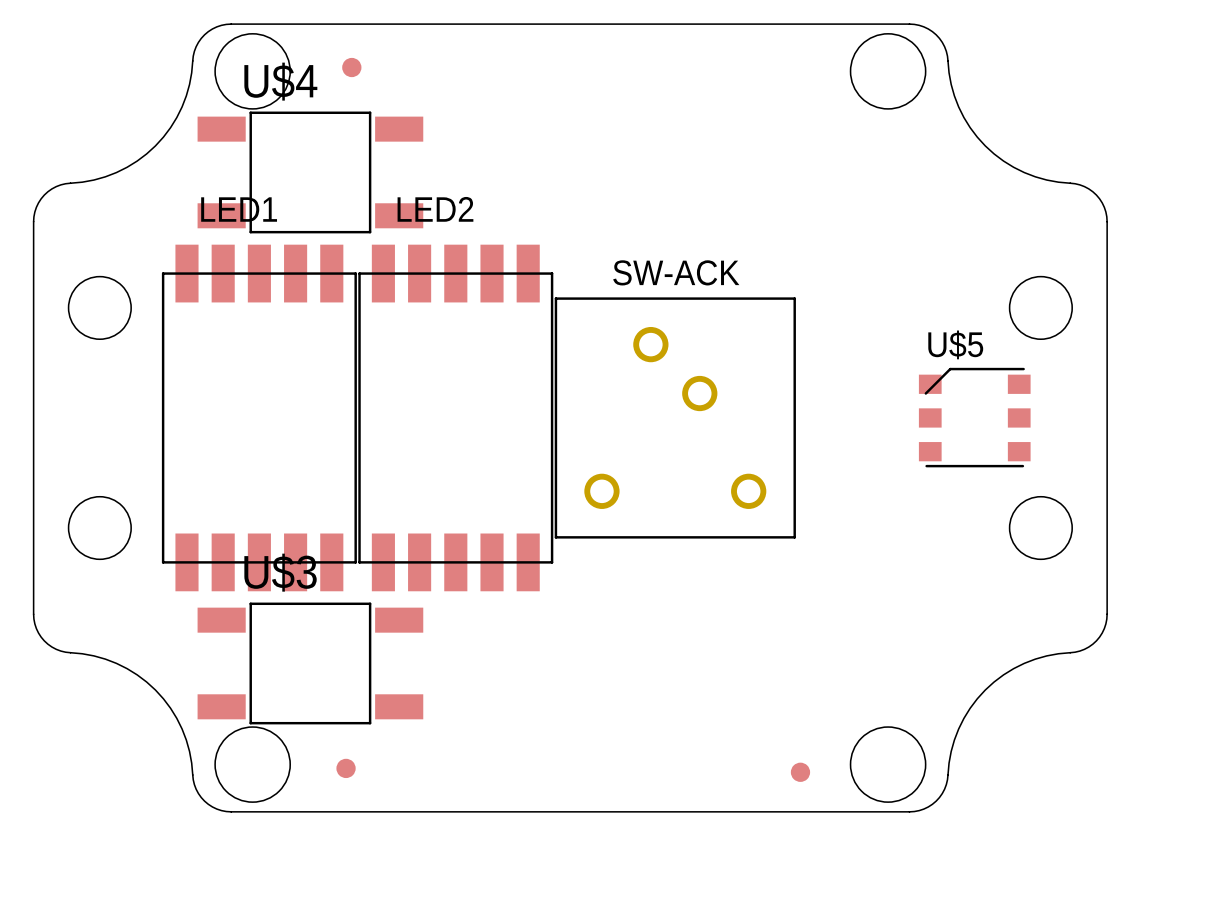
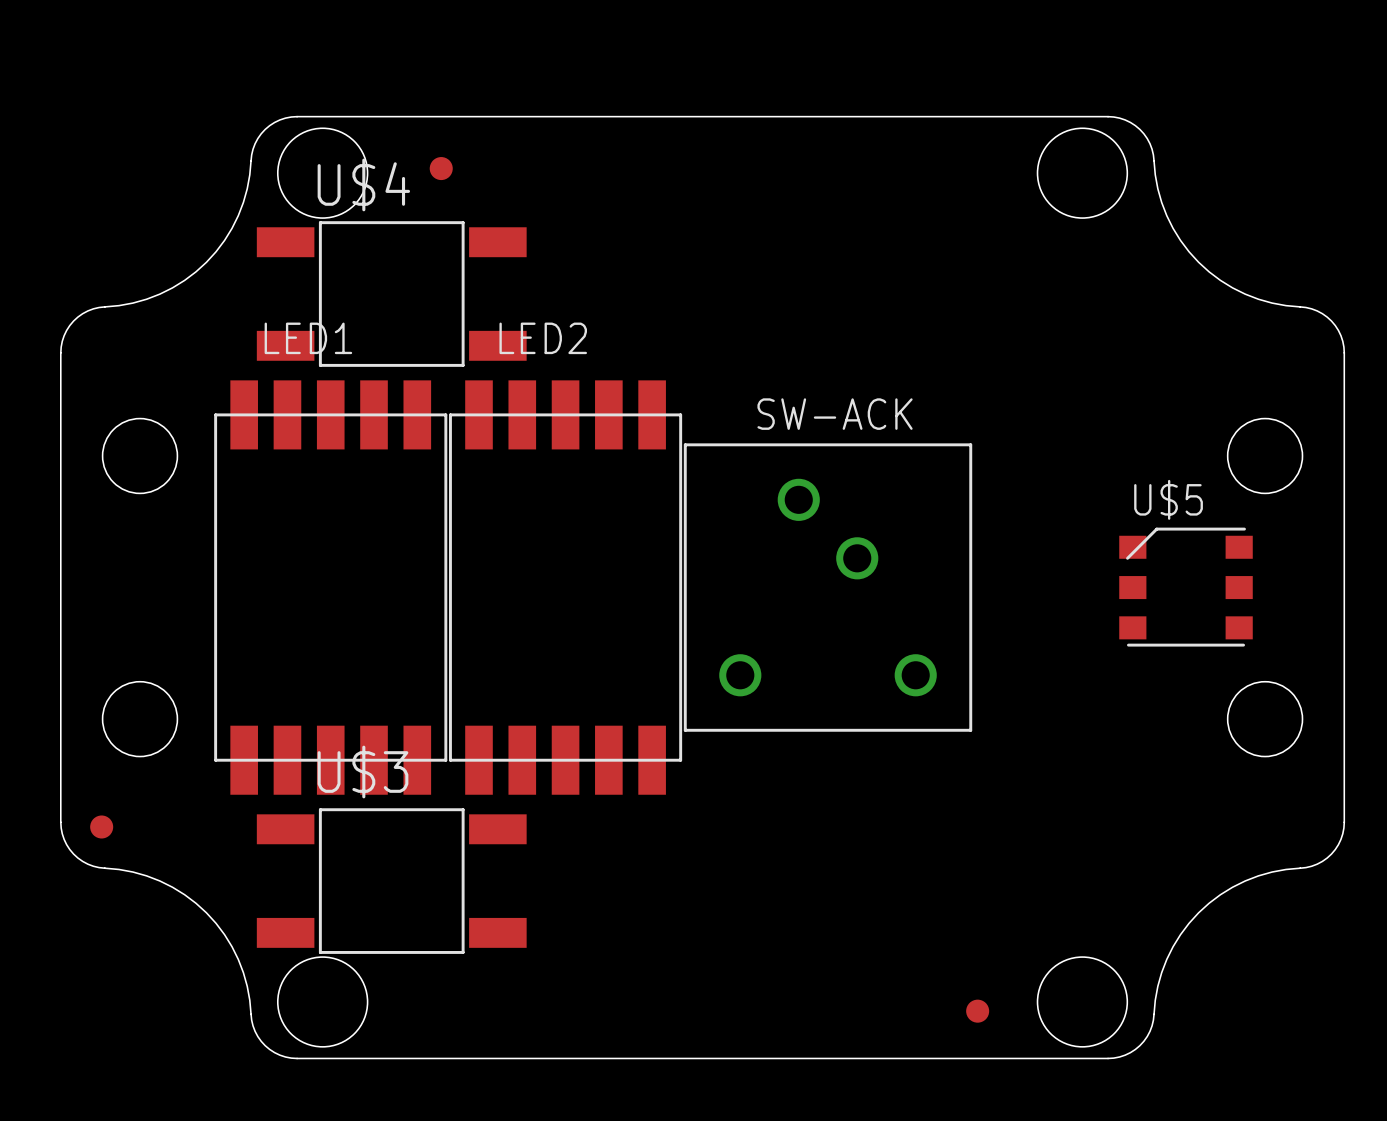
part position: (346, 768) -> (101, 826)

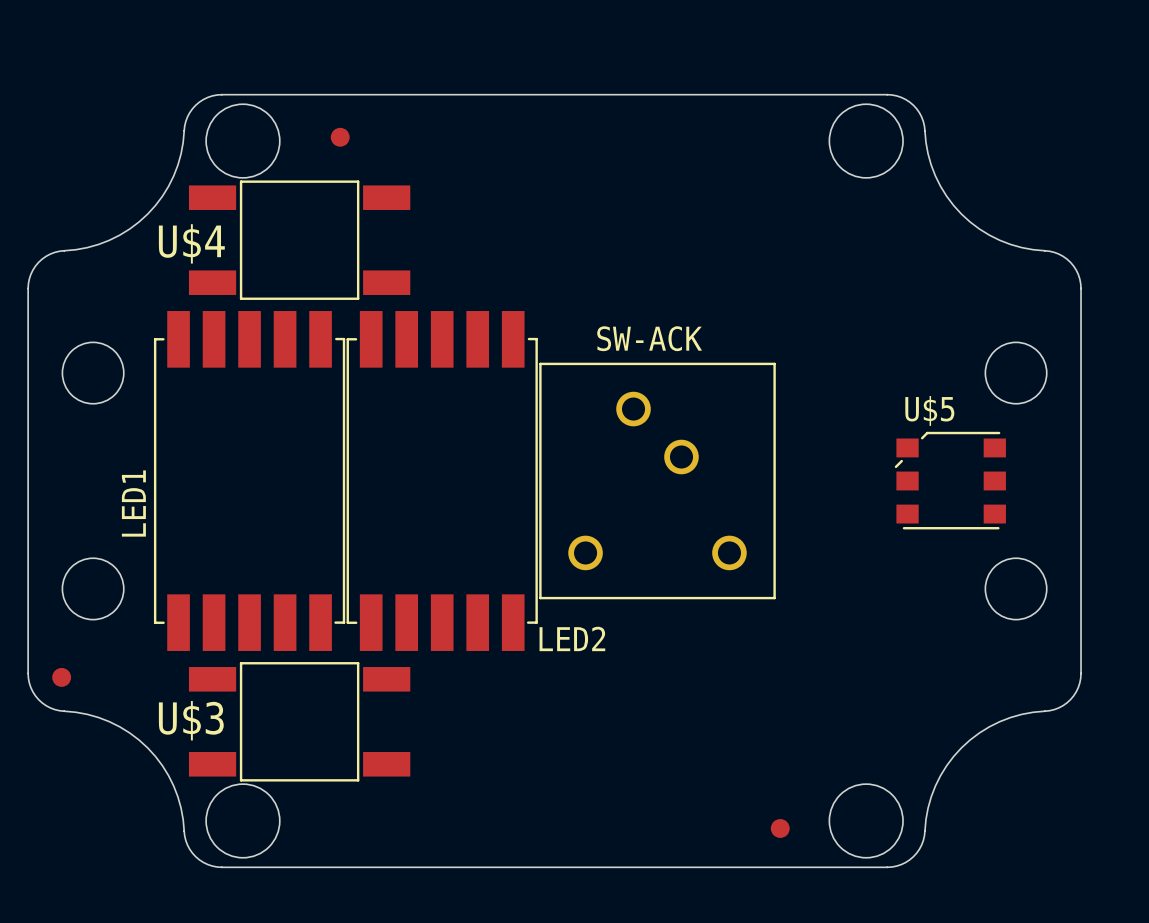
U$4 name position: U$4 (363, 184) -> U$4 (191, 243)
LED1 name position: LED1 (308, 338) -> LED1 (133, 503)
LED2 name position: LED2 (543, 338) -> LED2 (572, 638)
LED1 footprint: [214, 380, 448, 795] -> [153, 311, 346, 651]
LED2 footprint: [448, 380, 683, 795] -> [346, 311, 538, 651]
U$5 footprint: [1119, 527, 1253, 647] -> [894, 431, 1006, 530]
U$3 name position: U$3 (363, 772) -> U$3 (191, 720)

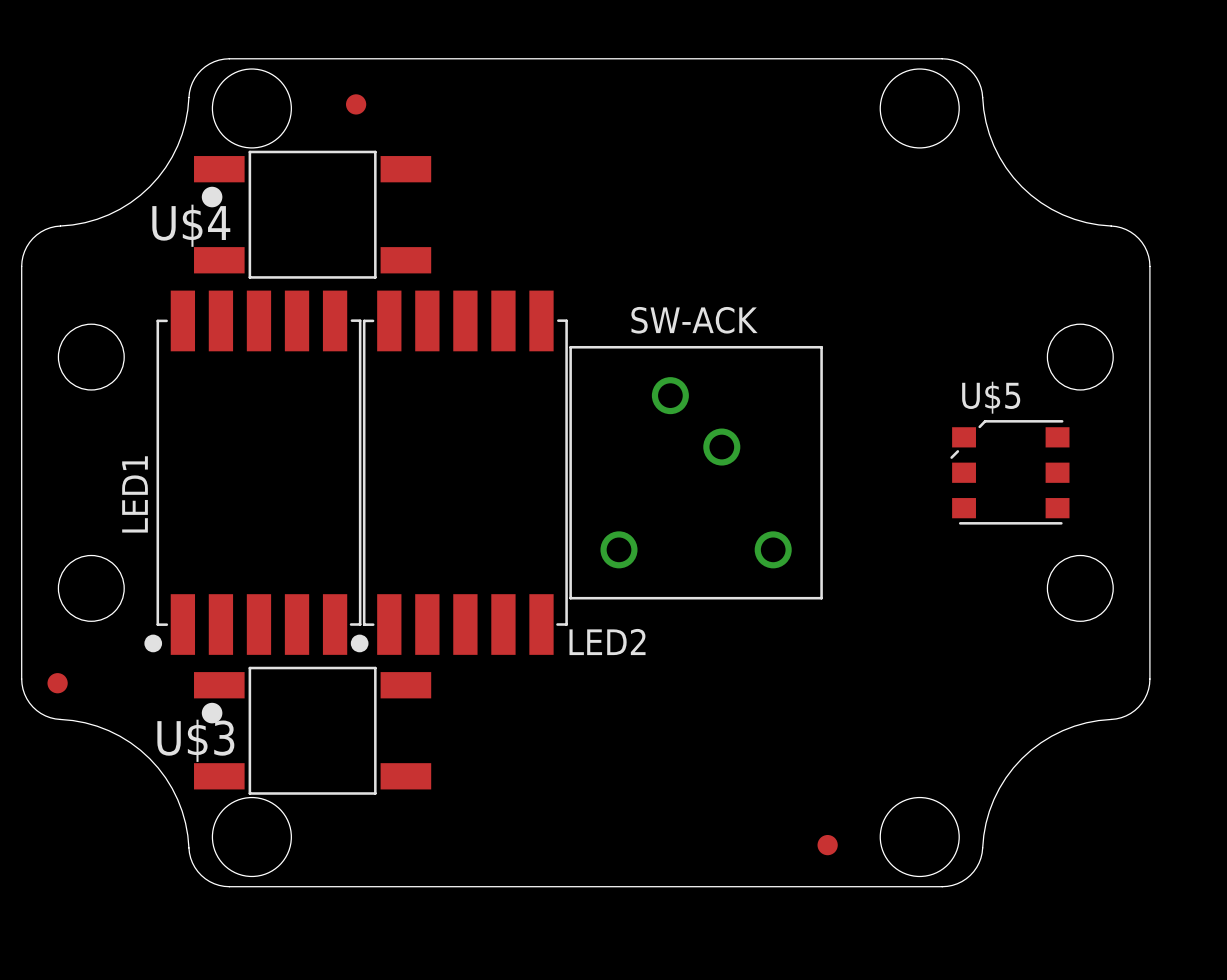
U$4 footprint: [188, 180, 411, 300] -> [194, 150, 432, 279]
LED1 footprint: [153, 311, 346, 651] -> [144, 290, 362, 655]
LED2 footprint: [346, 311, 538, 651] -> [350, 290, 568, 655]
U$3 footprint: [188, 662, 411, 782] -> [194, 666, 432, 795]

